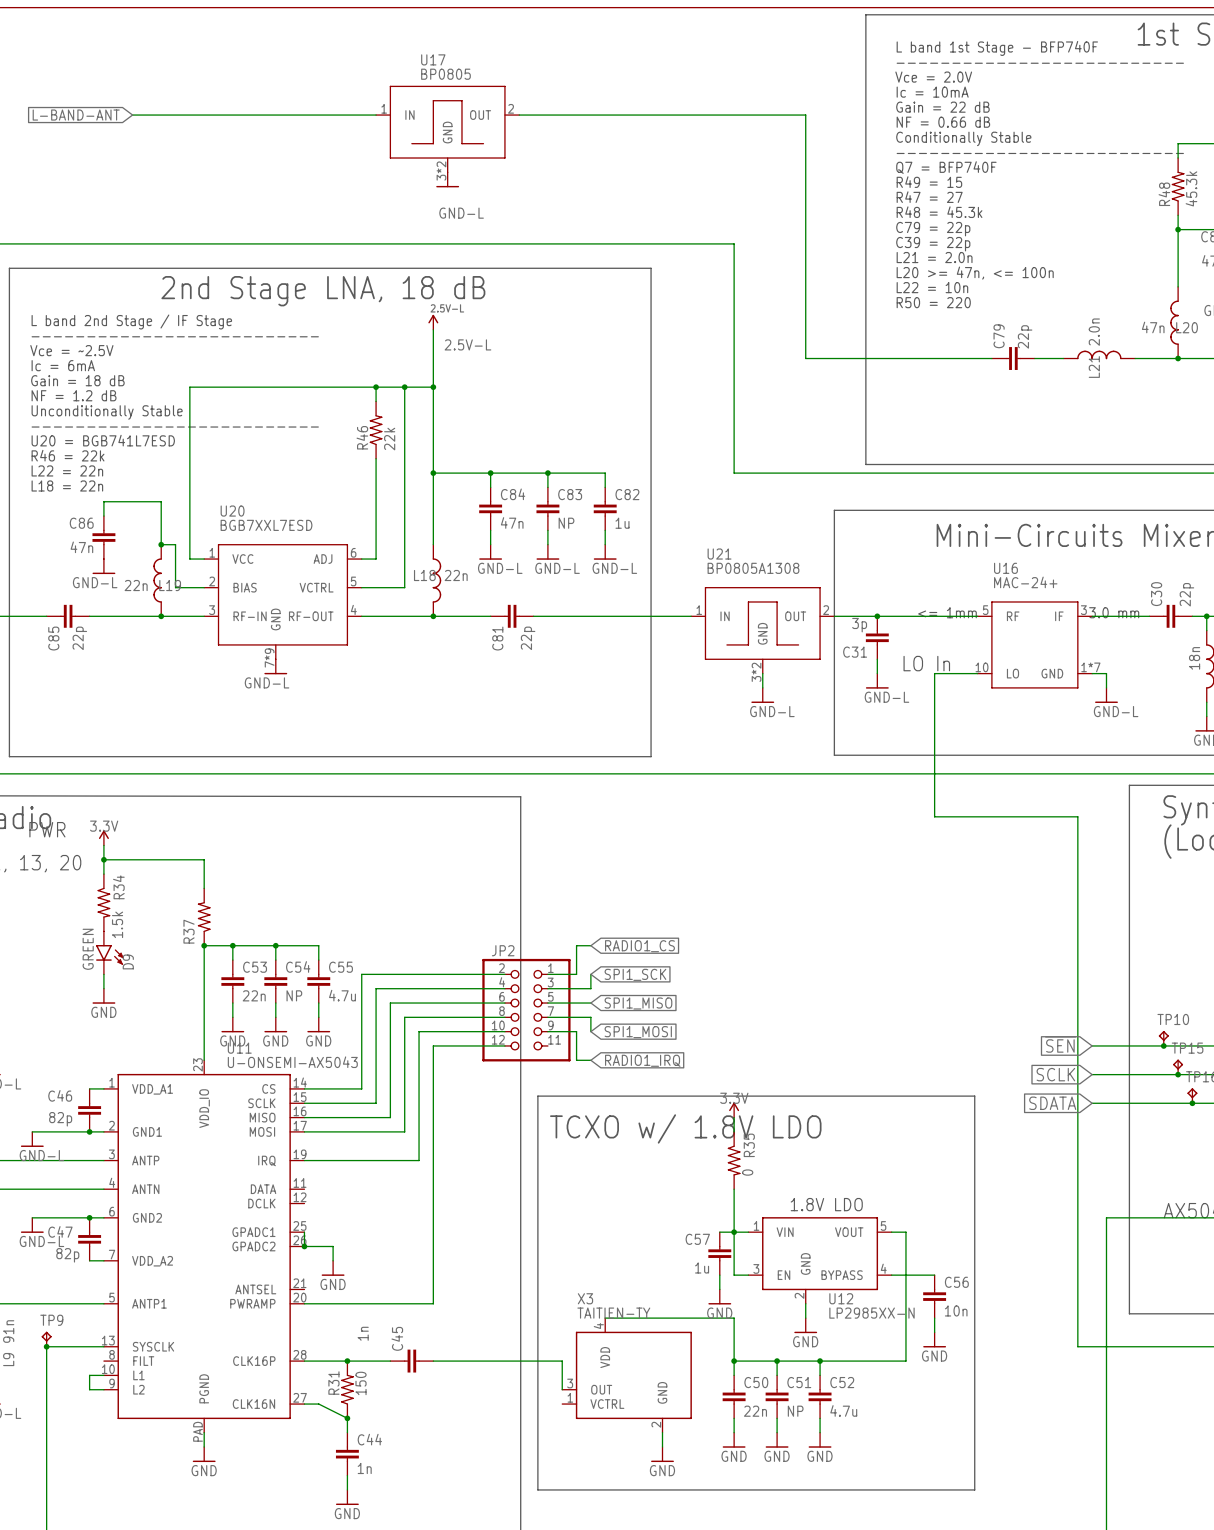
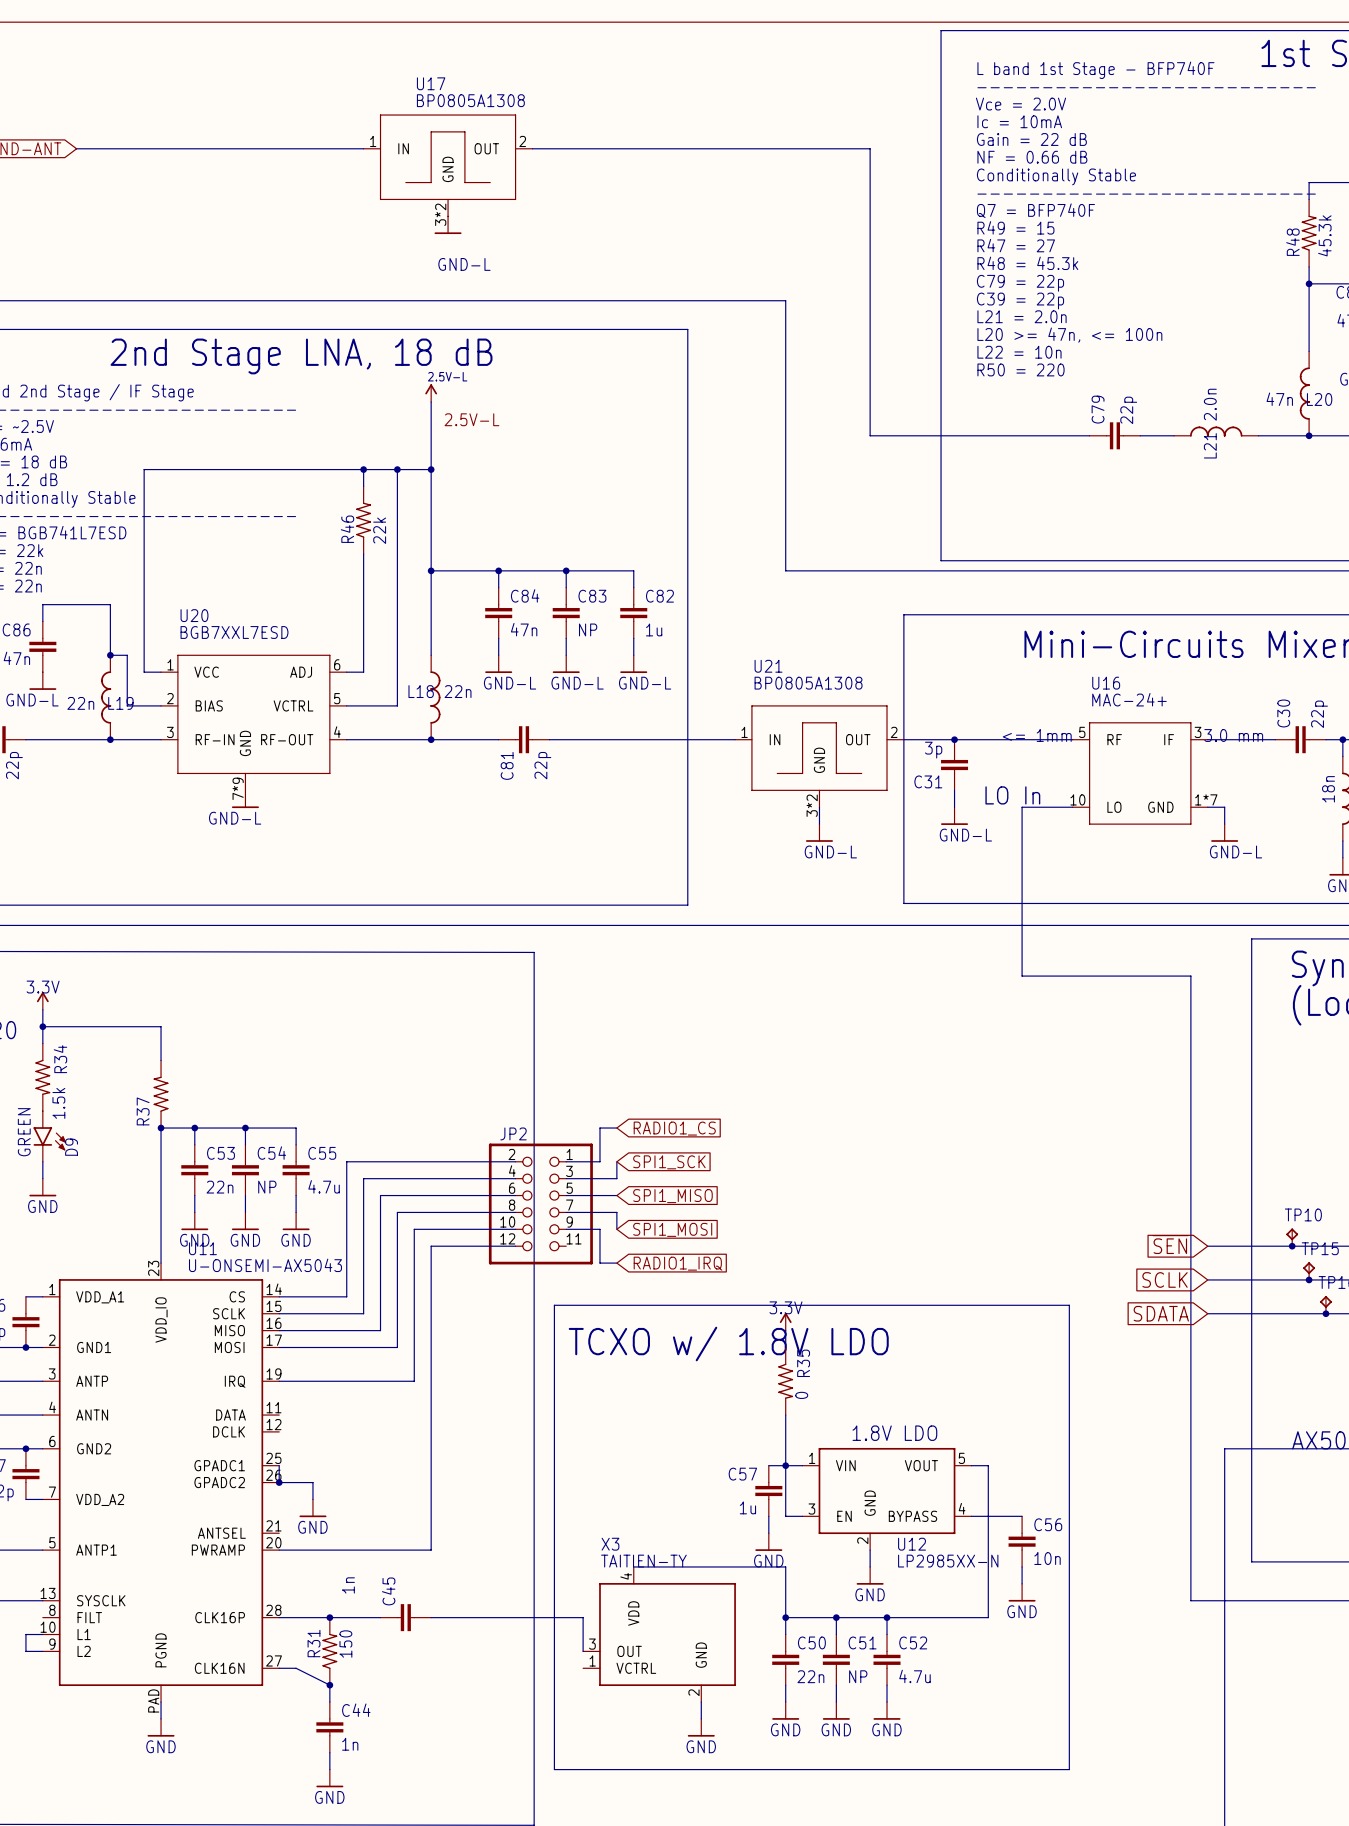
U17 value: BP0805 (445, 74) -> BP0805A1308 (470, 100)

